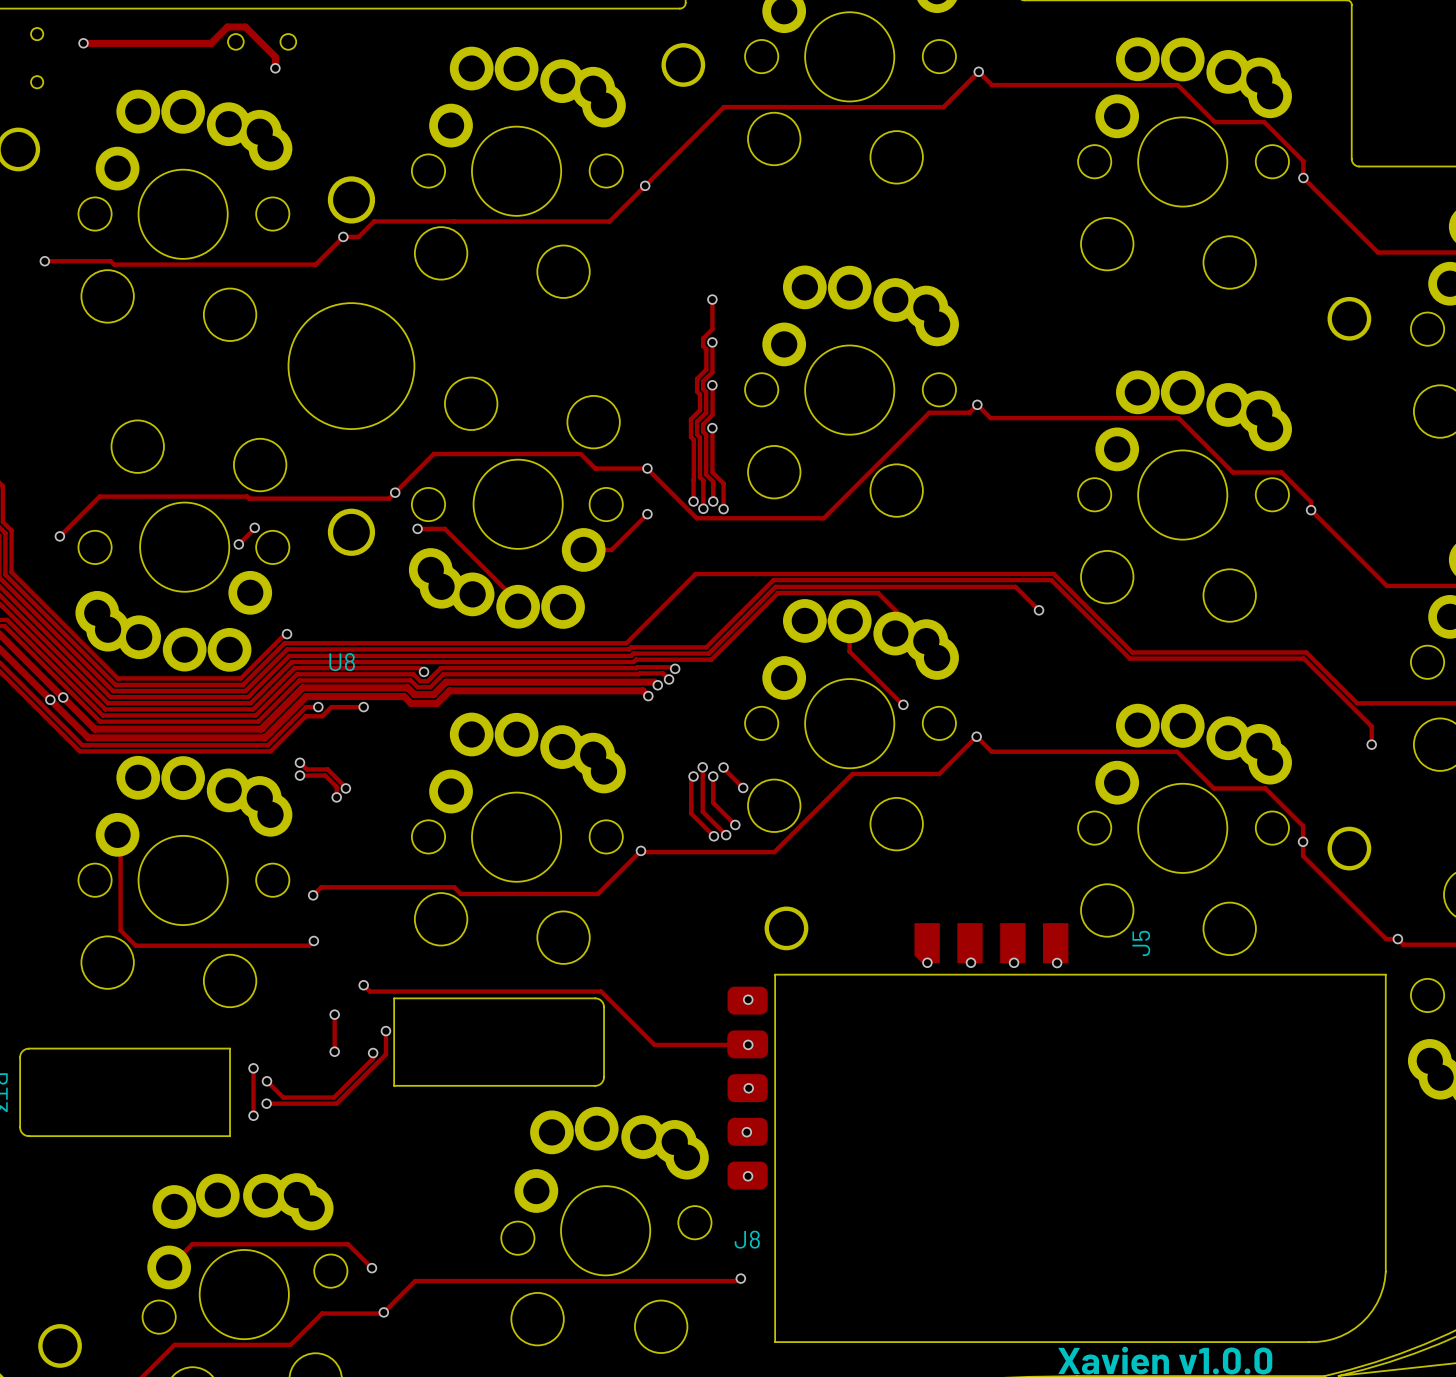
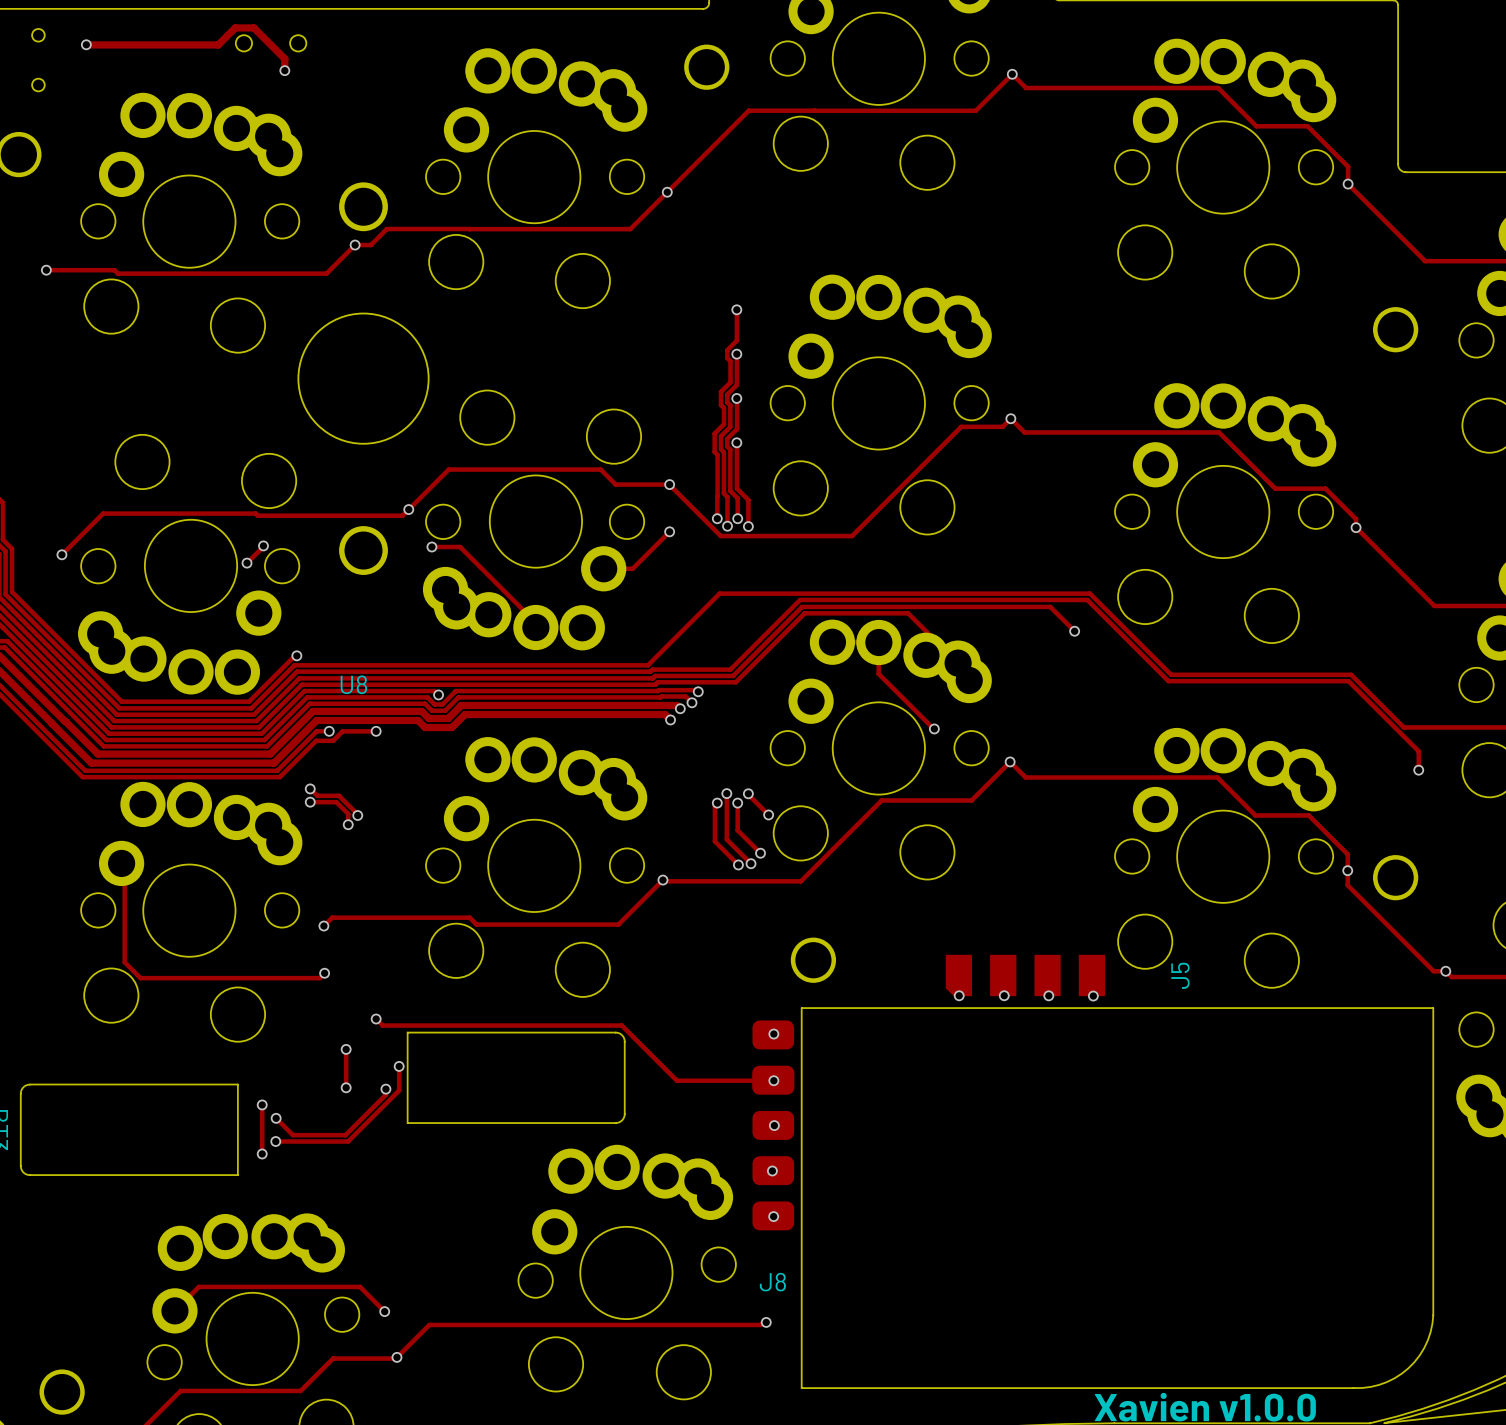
via: (63, 697) -> none
via: (50, 699) -> none

